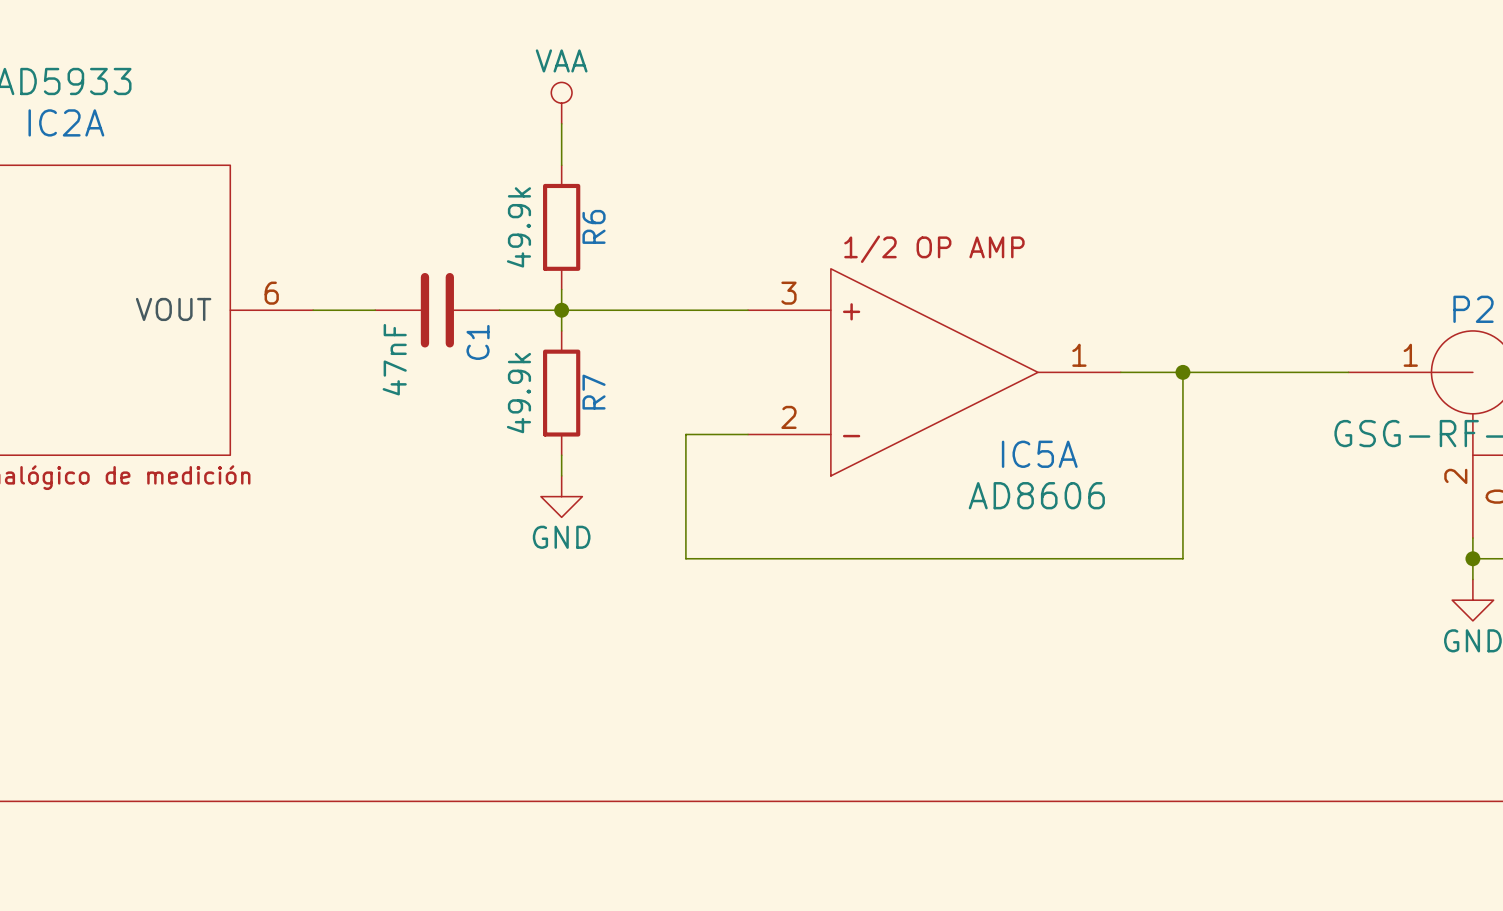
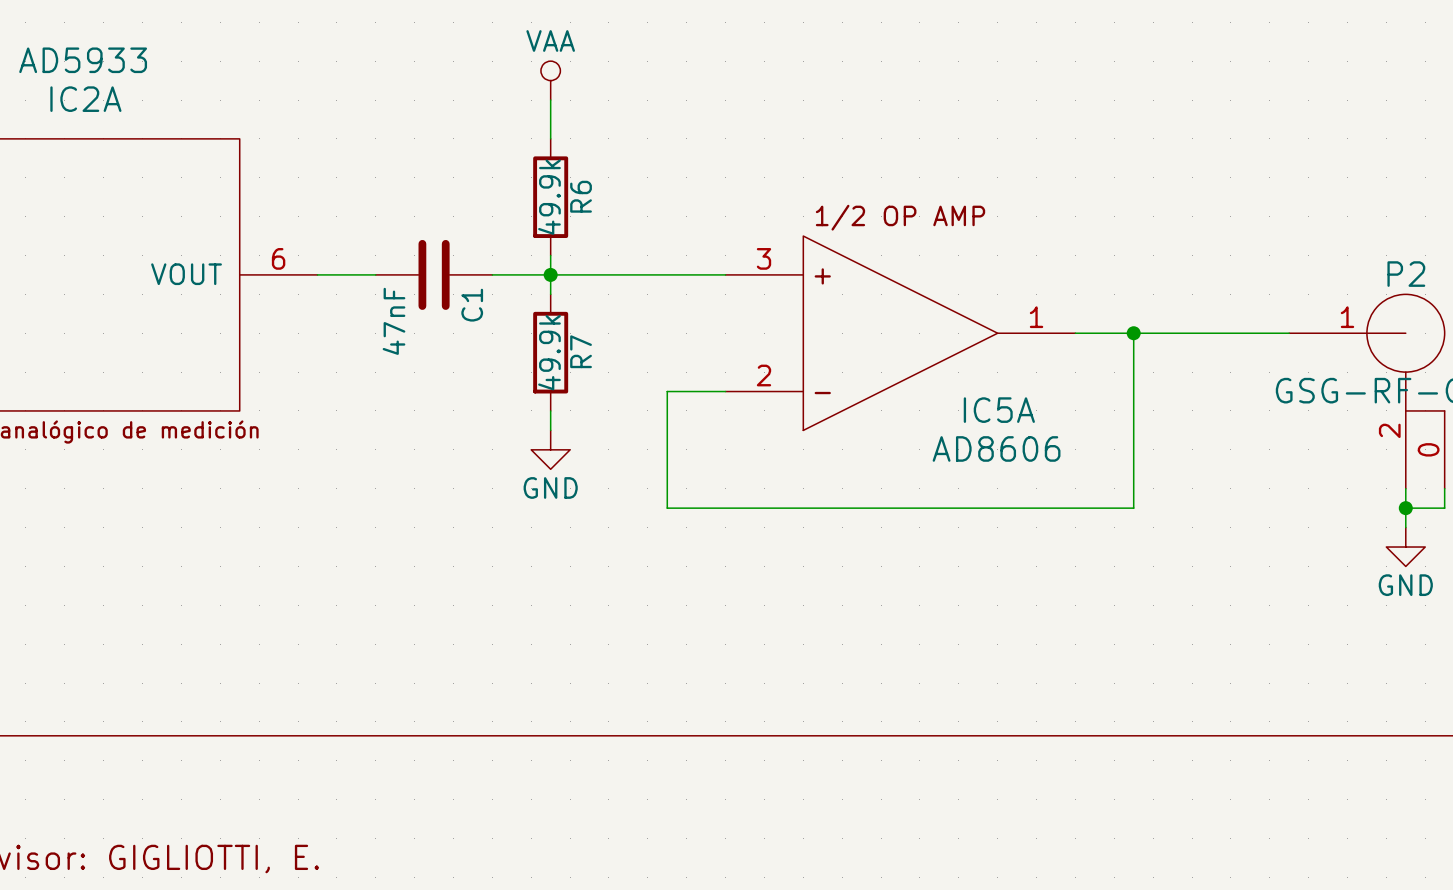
R6 value position: 49.9k (518, 227) -> 49.9k (549, 197)
R7 value position: 49.9k (518, 393) -> 49.9k (549, 352)

